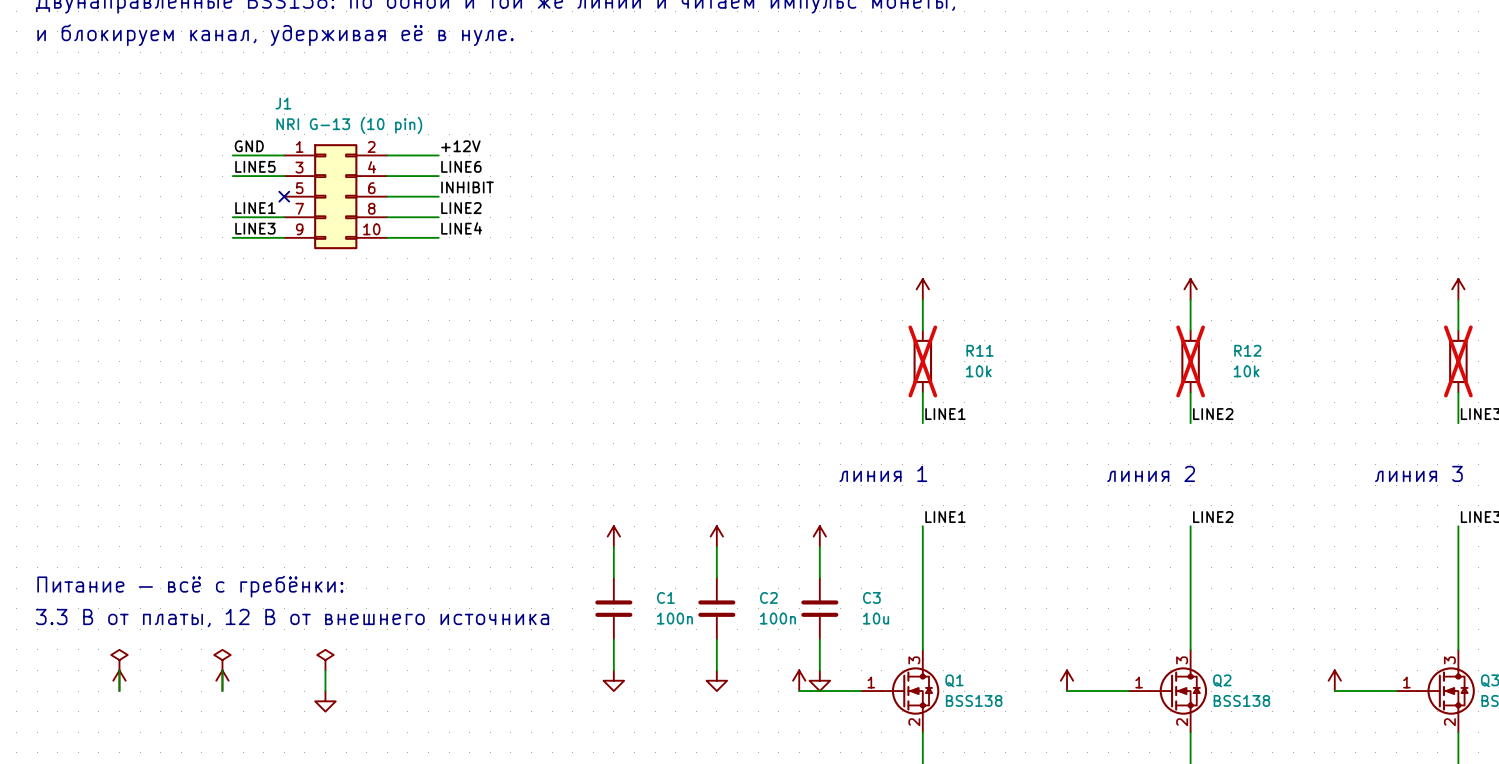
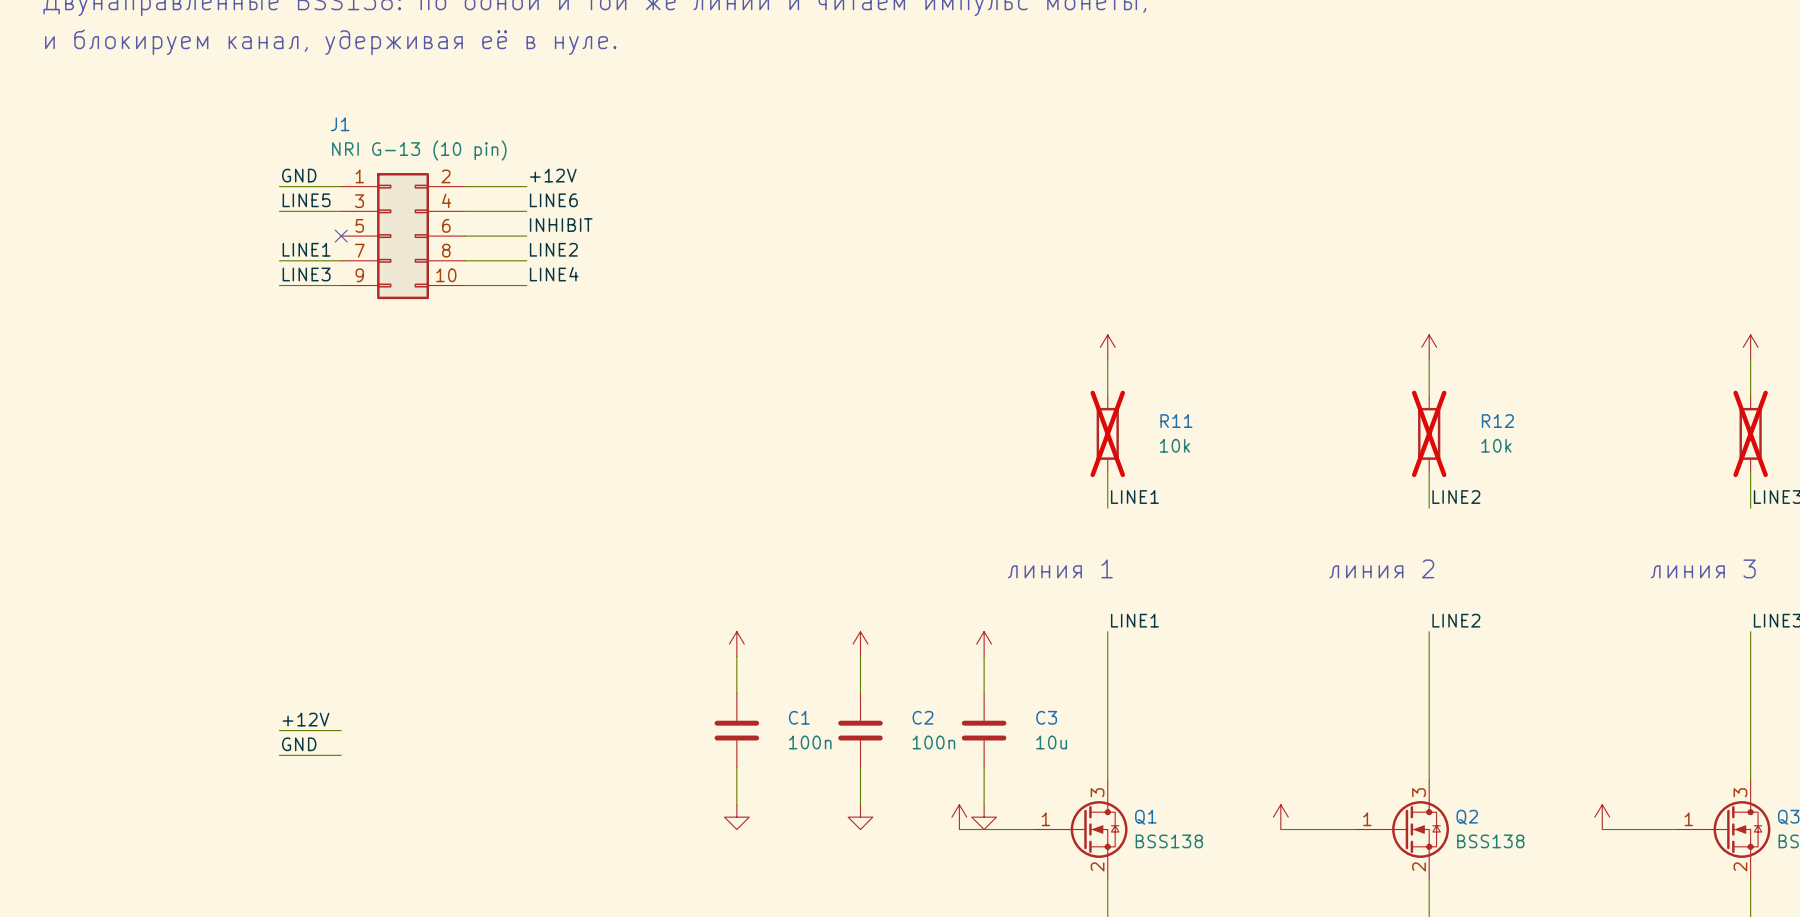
text: Питание — всё с гребёнки: (190, 586) -> none
label: none -> +12V (306, 719)
wire: none -> (279, 730) (341, 730)
text: 3.3 В от платы, 12 В от внешнего источника (292, 618) -> none
label: none -> GND (299, 744)
wire: none -> (279, 755) (341, 755)
power symbol: (119, 660) -> none
power symbol: (222, 660) -> none
power symbol: (325, 660) -> none
wire: (119, 670) (119, 691) -> none
wire: (222, 670) (222, 691) -> none
wire: (325, 670) (325, 691) -> none
power symbol: (119, 680) -> none
power symbol: (222, 680) -> none
power symbol: (325, 701) -> none

